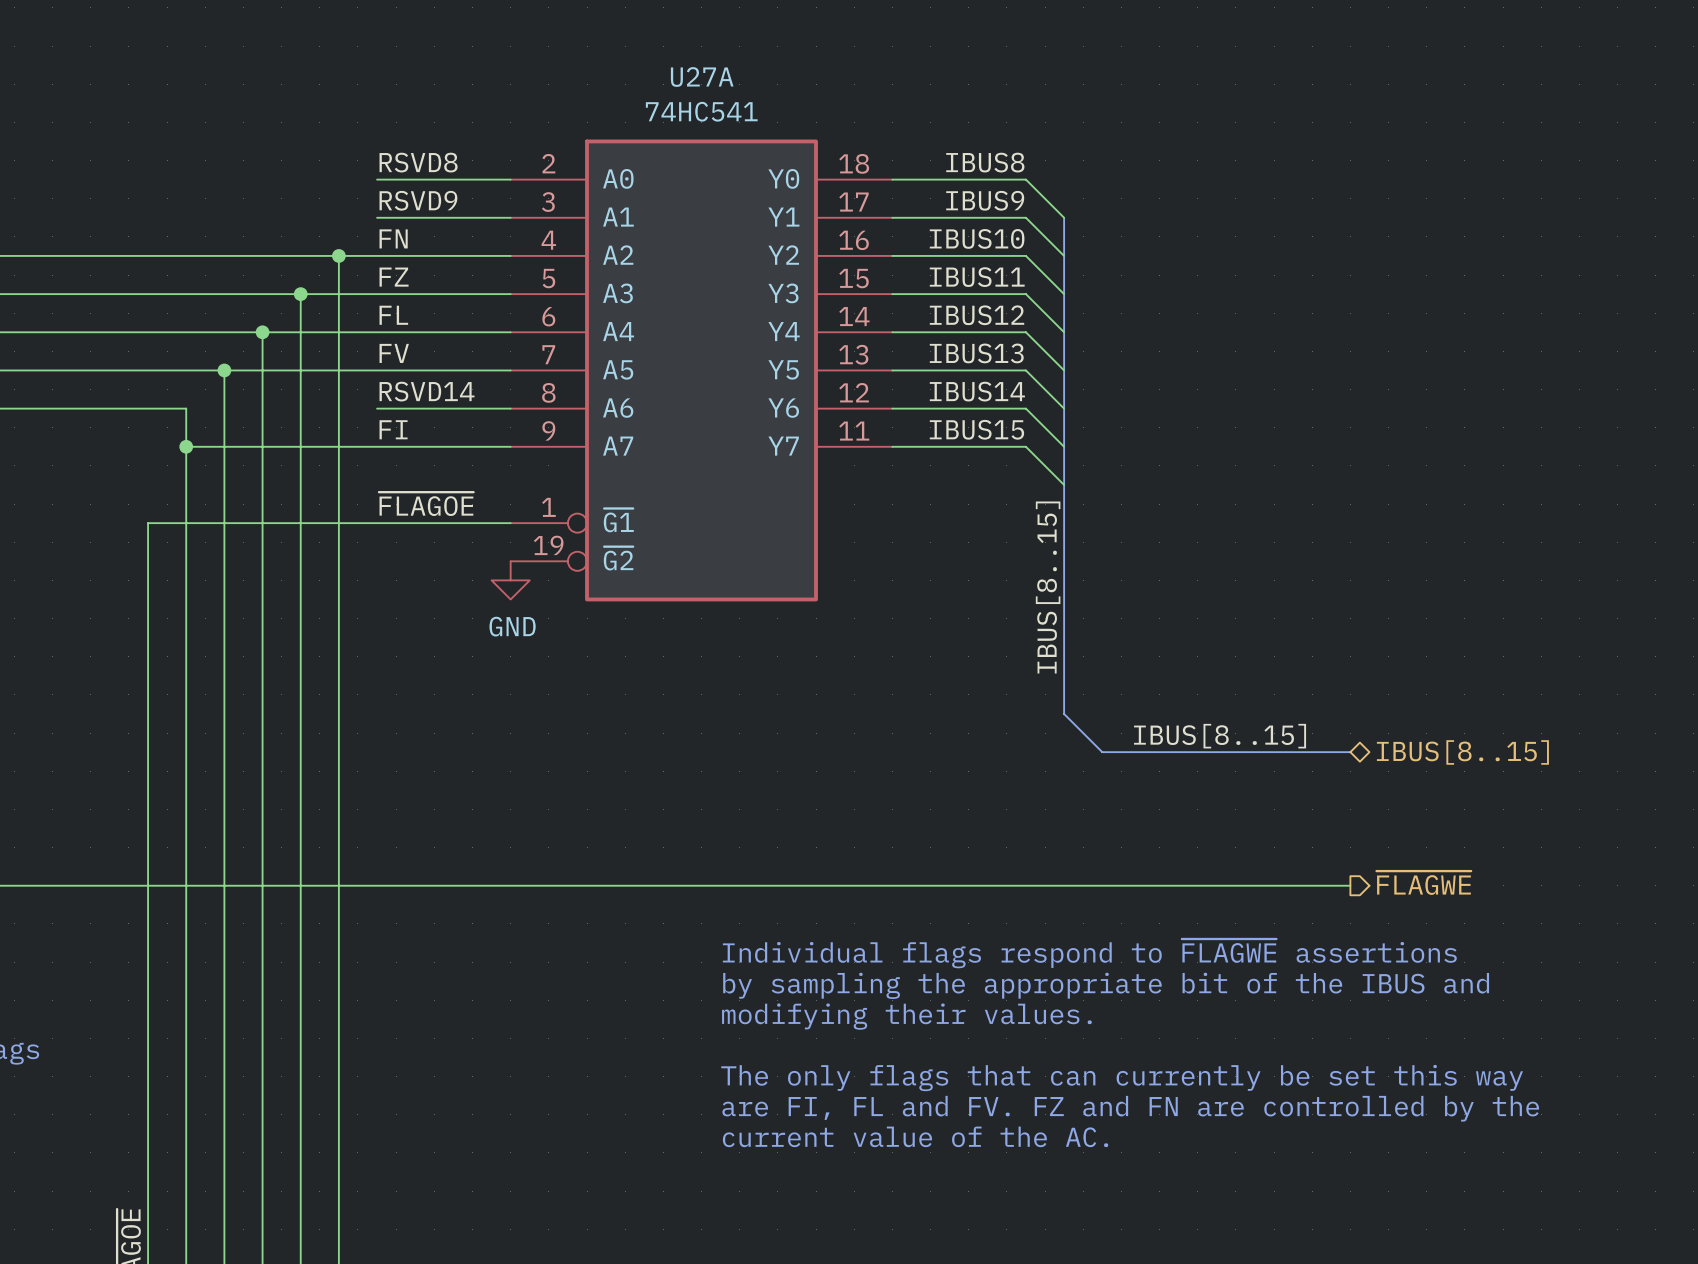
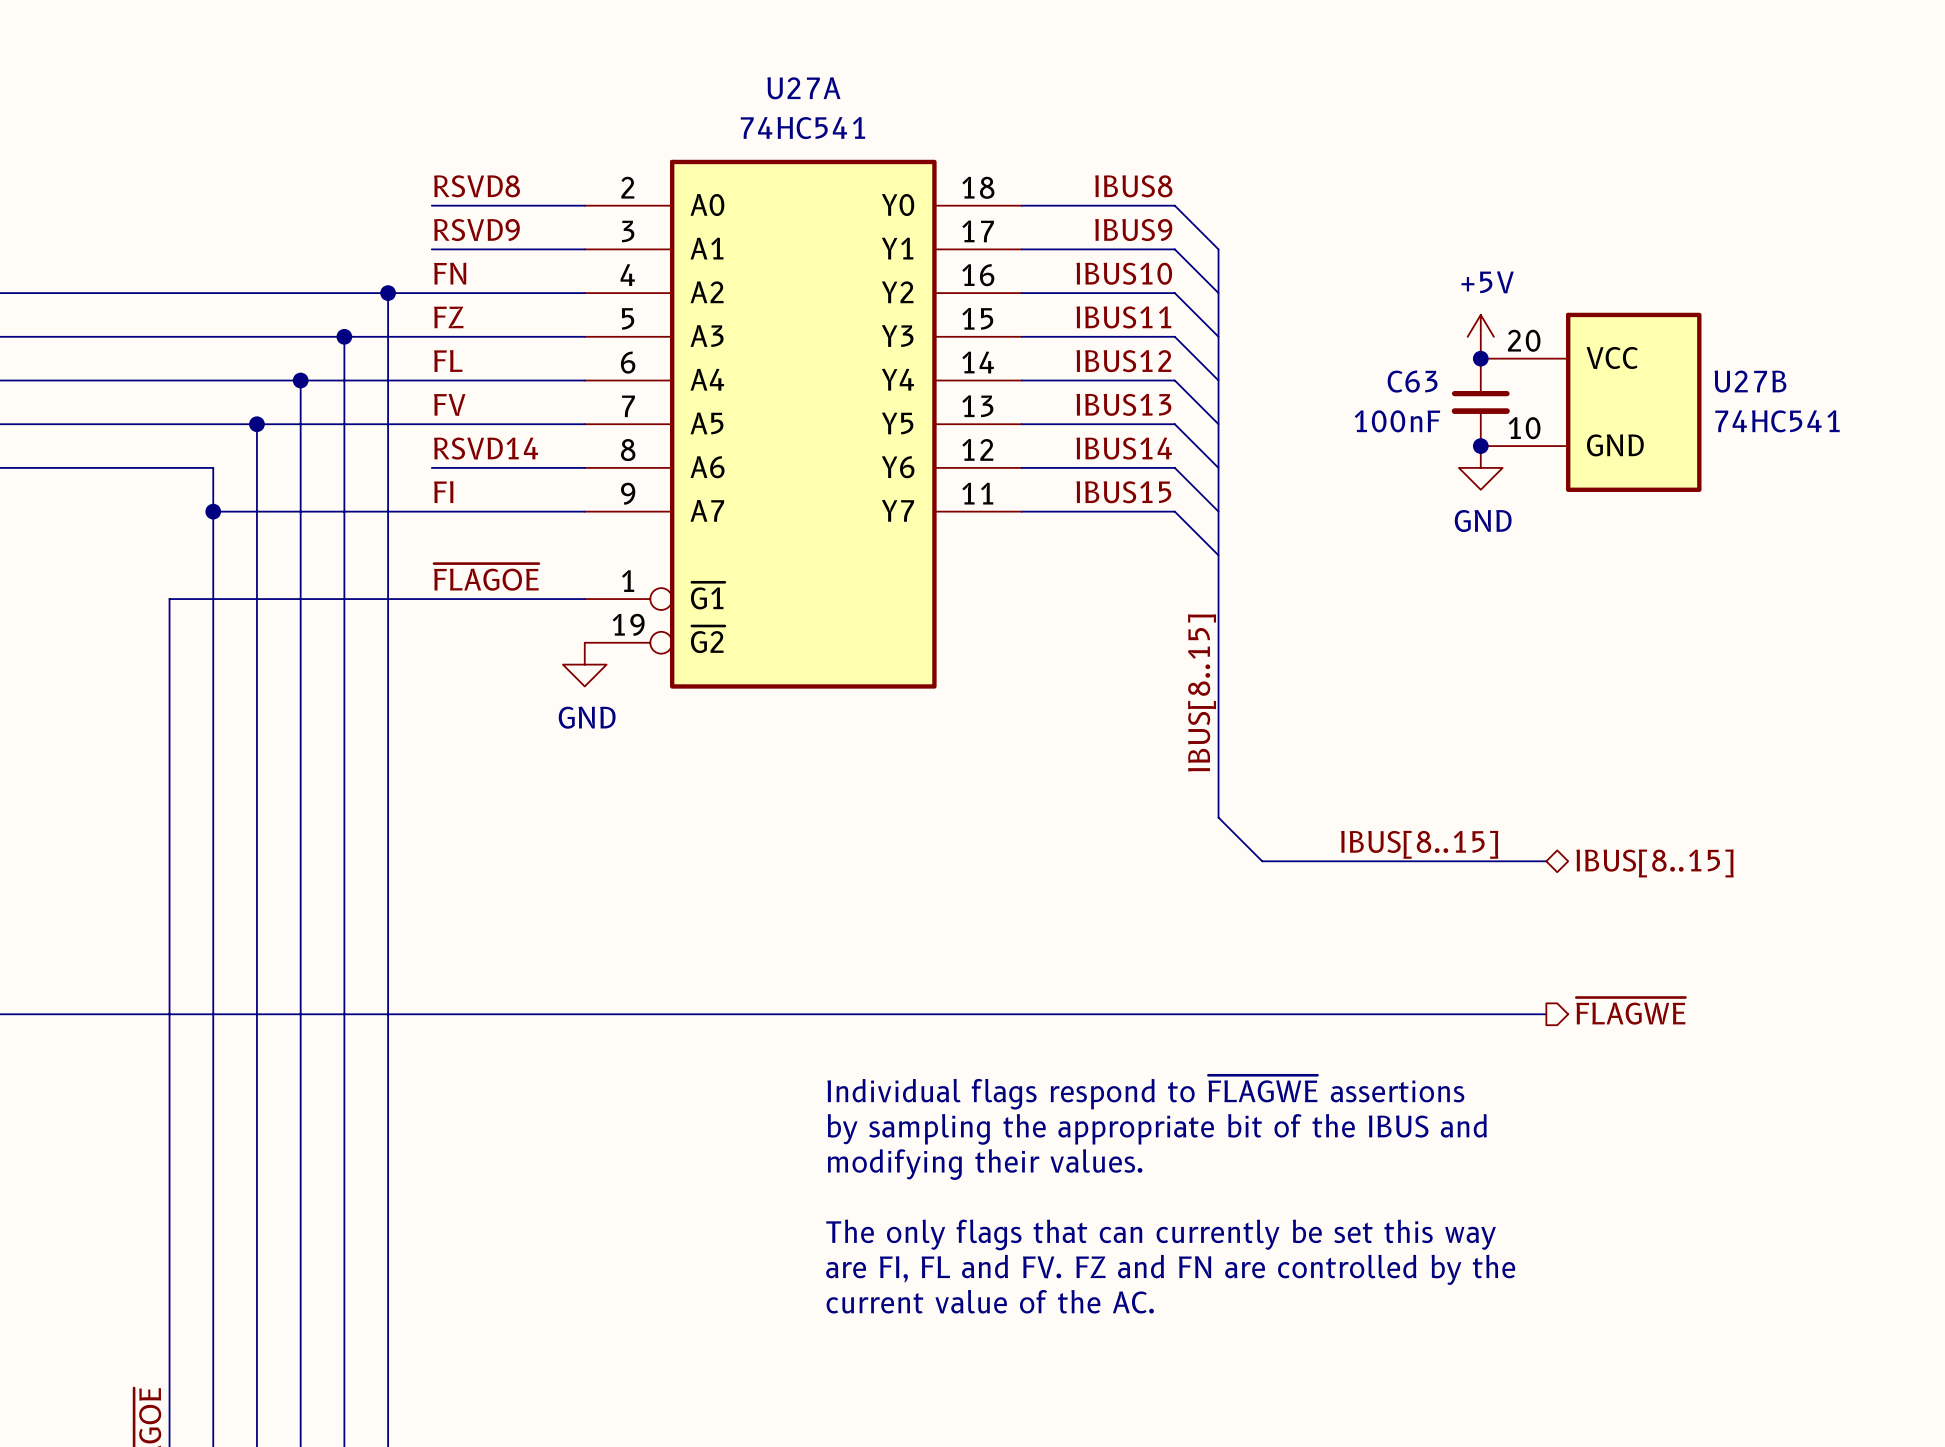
power symbol: none -> +5V (1480, 336)
junction: none -> (1480, 358)
C63: none -> 100nF (1480, 402)
U27B: none -> 74HC541 (1591, 402)
junction: none -> (1480, 446)
power symbol: none -> GND (1480, 467)

